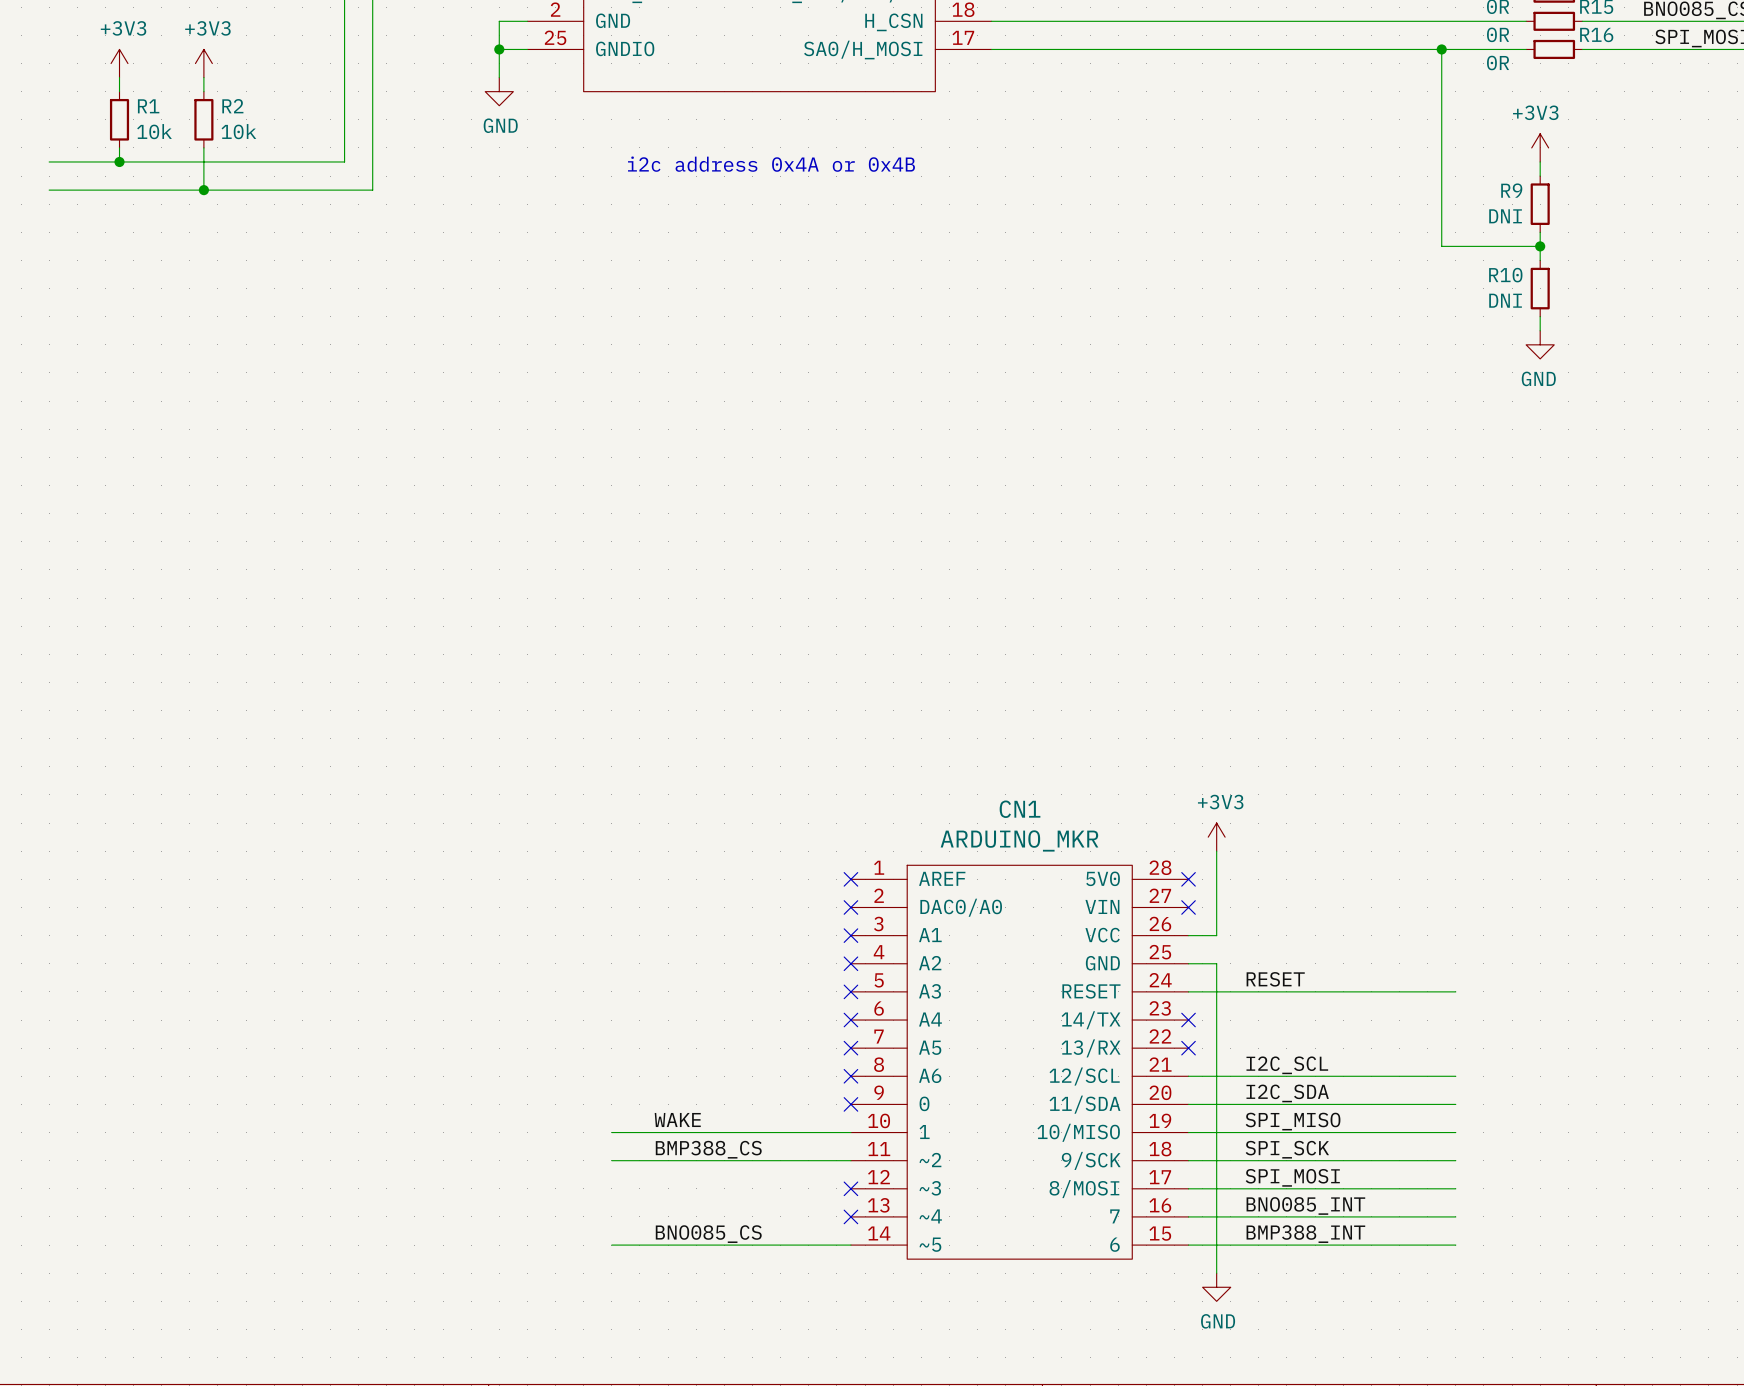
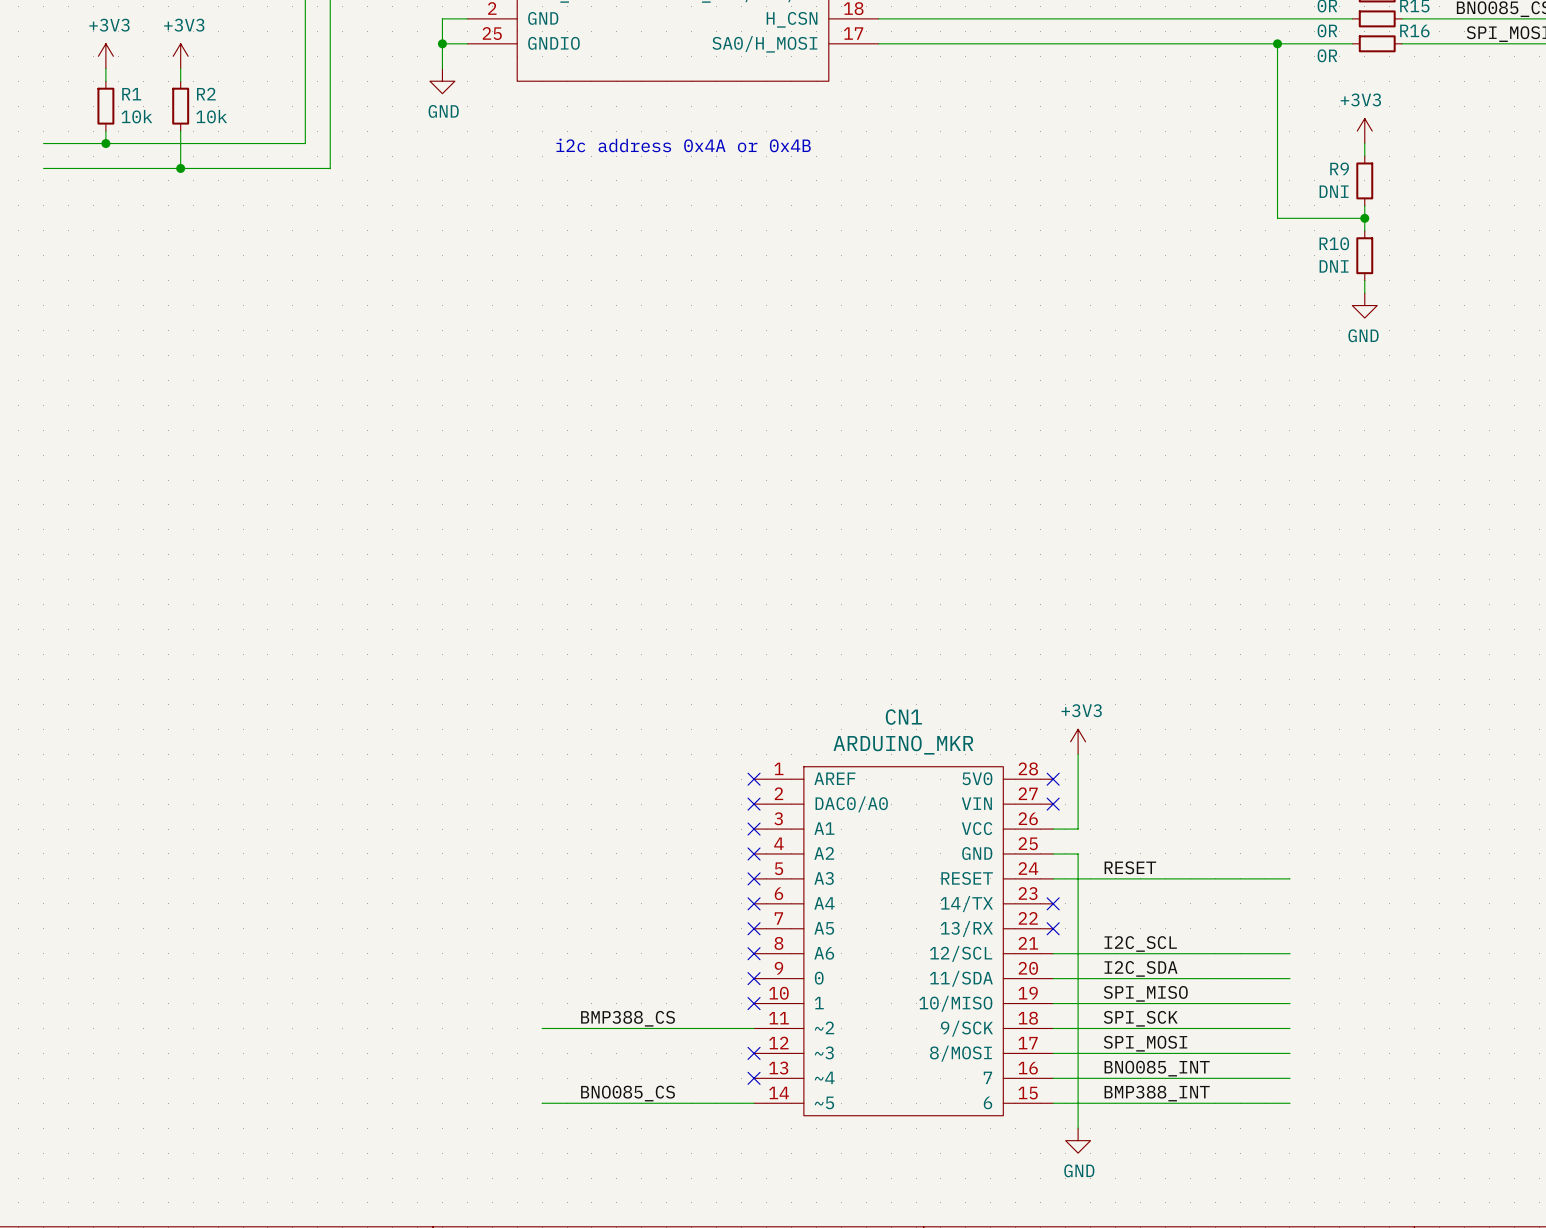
label: WAKE (677, 1119) -> none
wire: (611, 1132) (850, 1132) -> none
no-connect mark: none -> (754, 1003)

